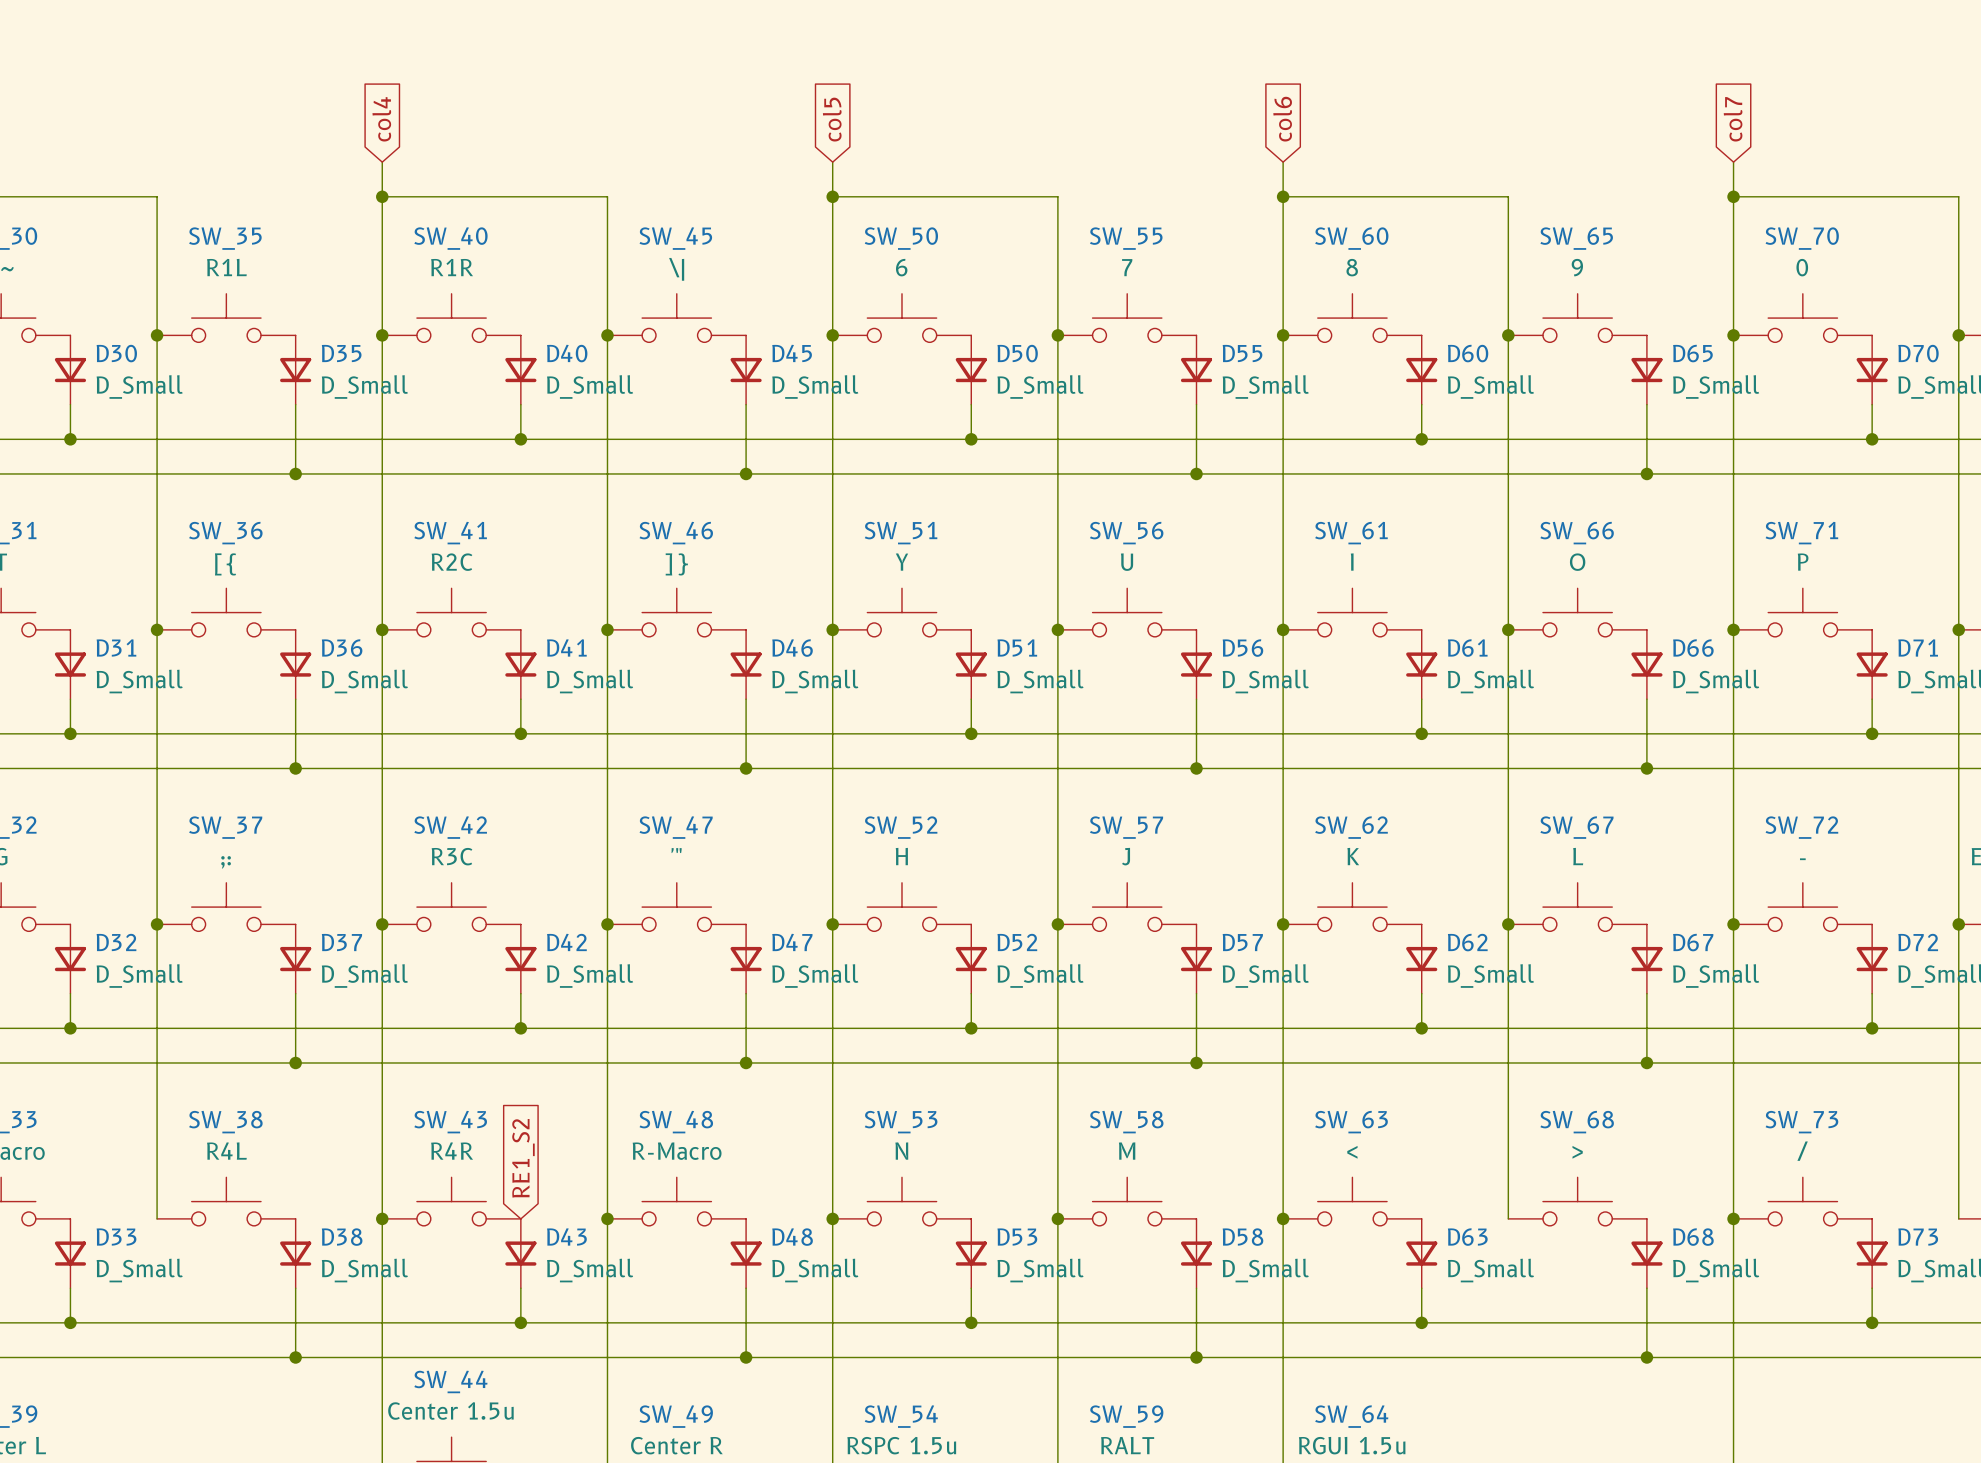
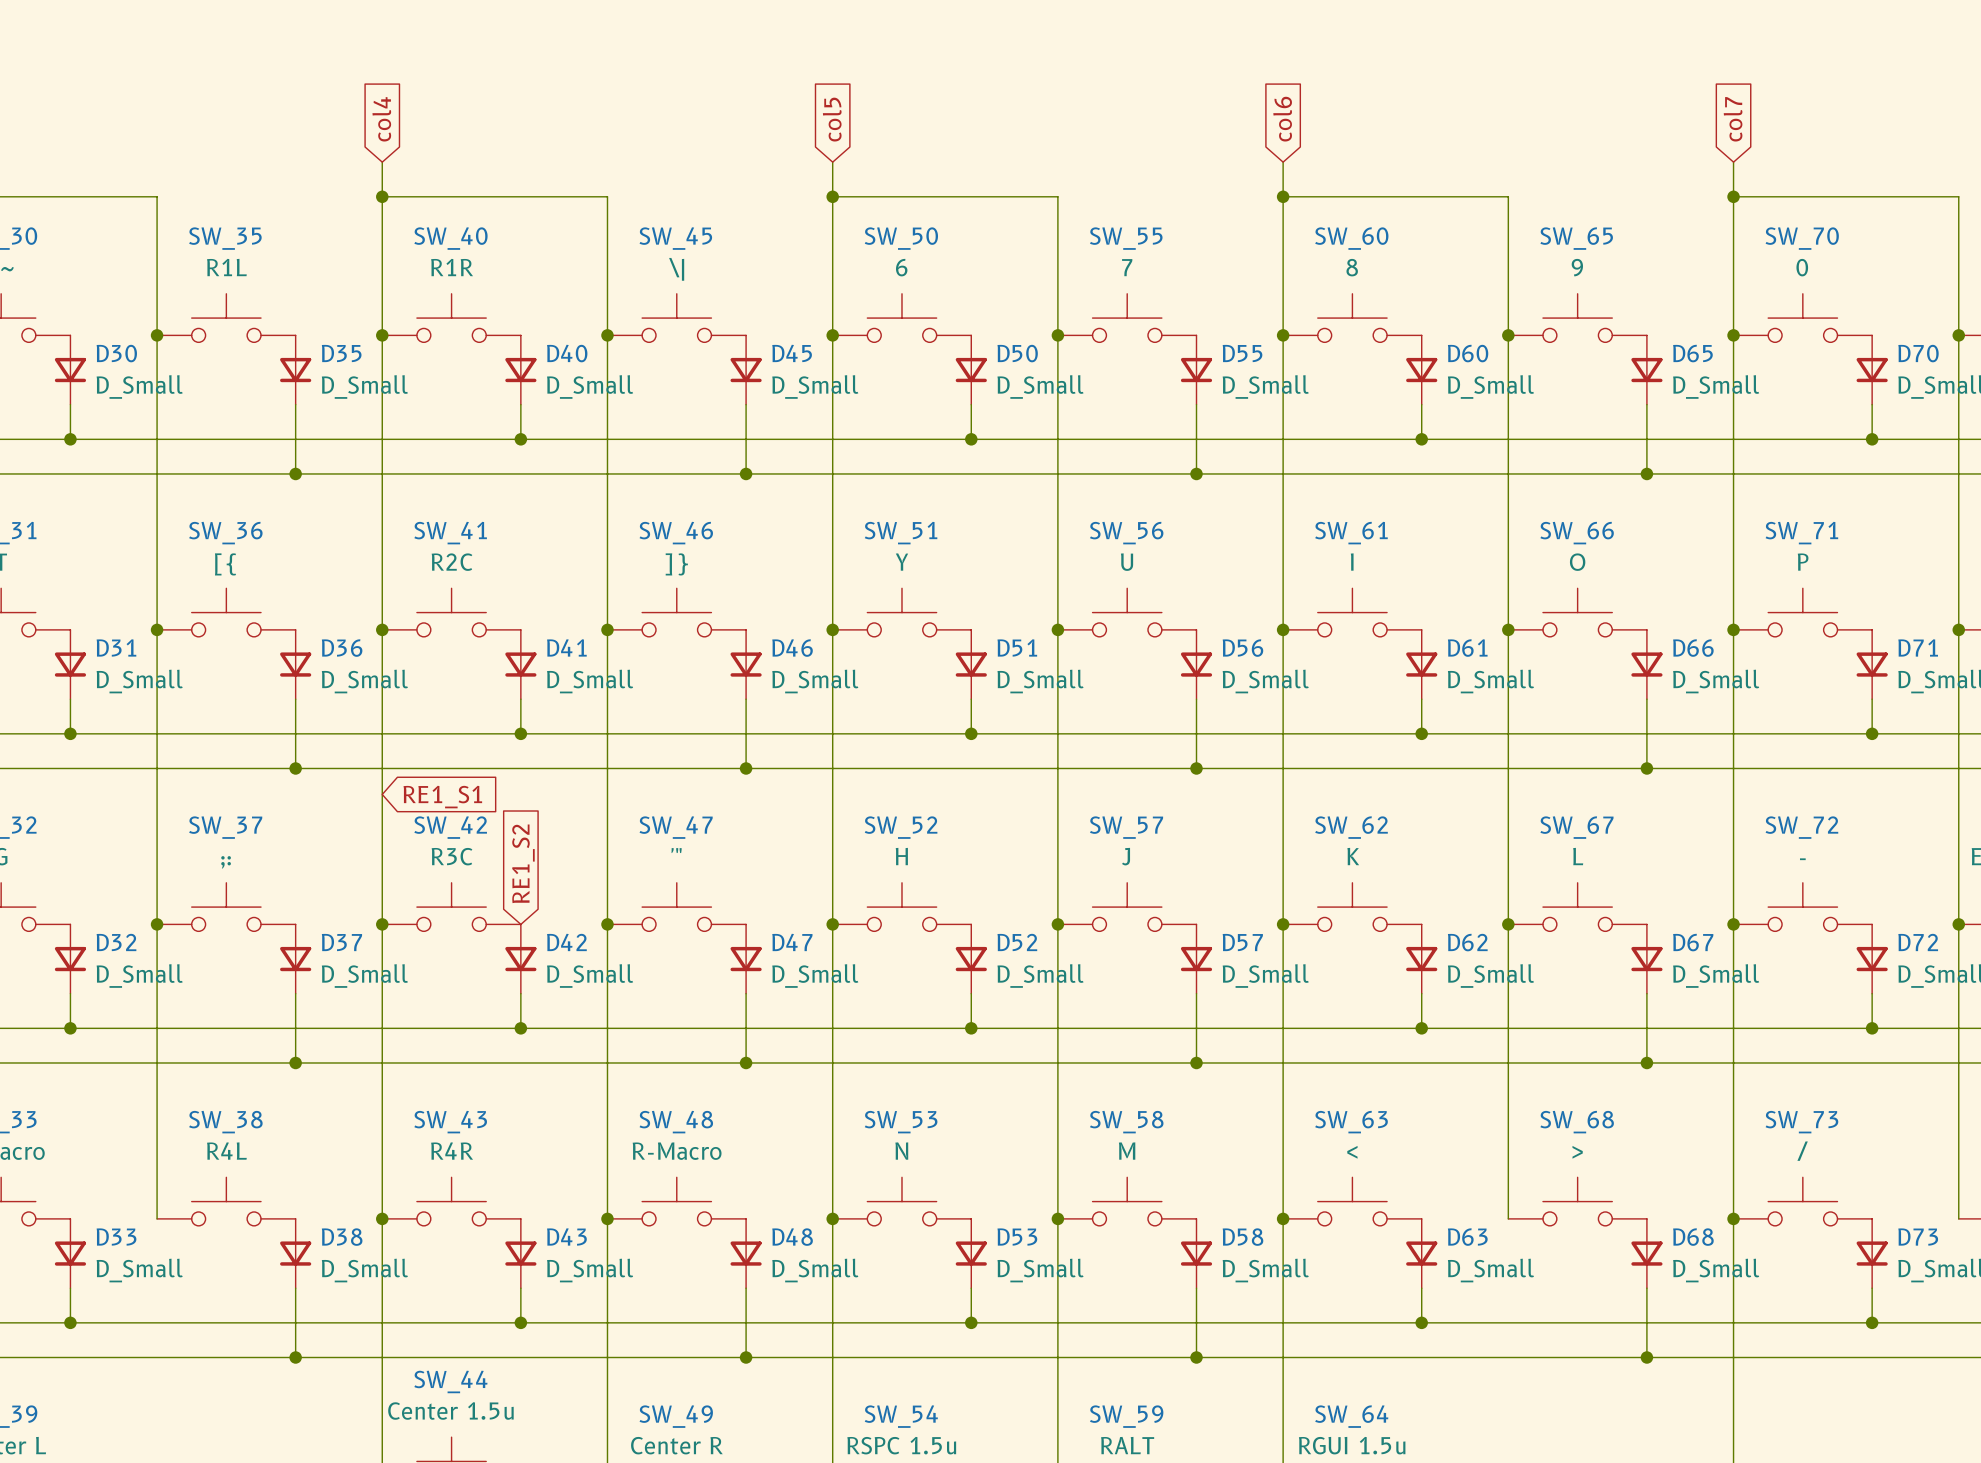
global label: none -> RE1_S1 (442, 797)
global label position: RE1_S2 (523, 1158) -> RE1_S2 (523, 863)

